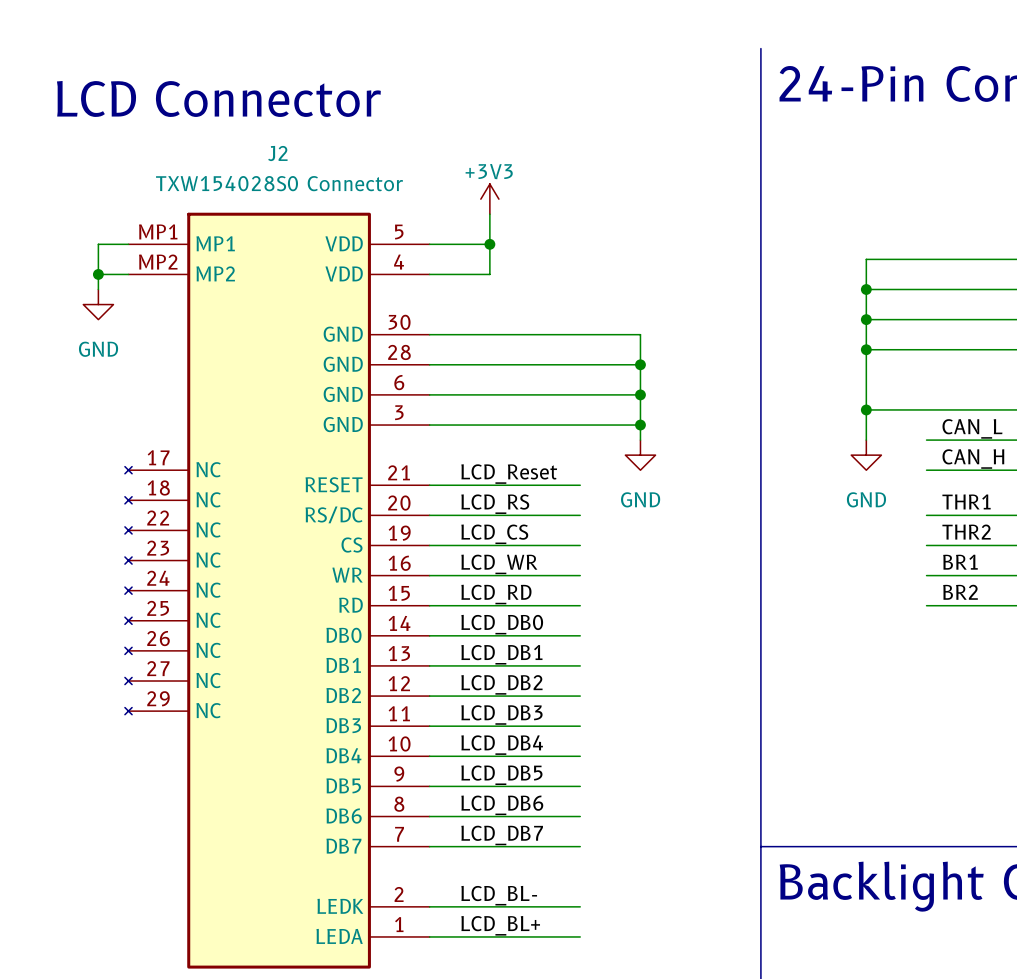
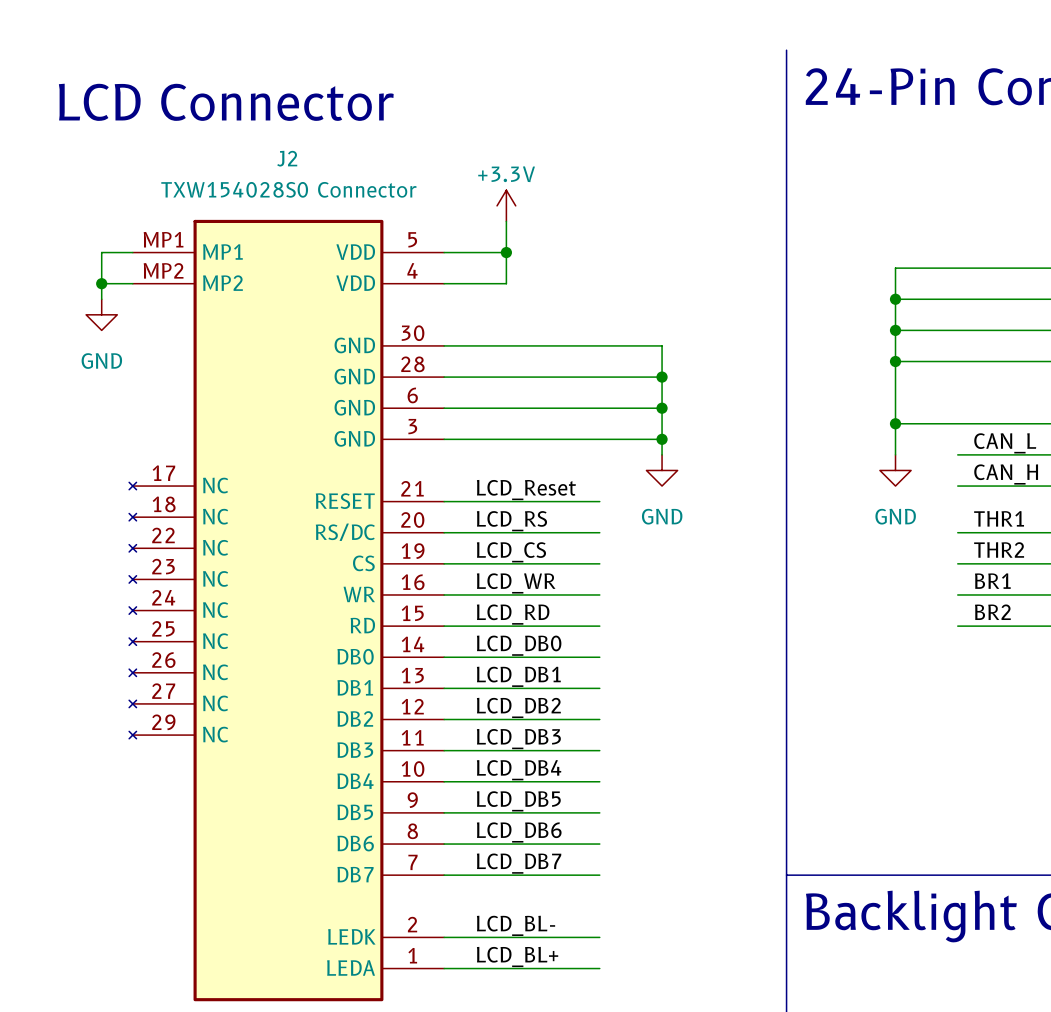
power symbol: +3V3 (489, 199) -> +3.3V (506, 205)

